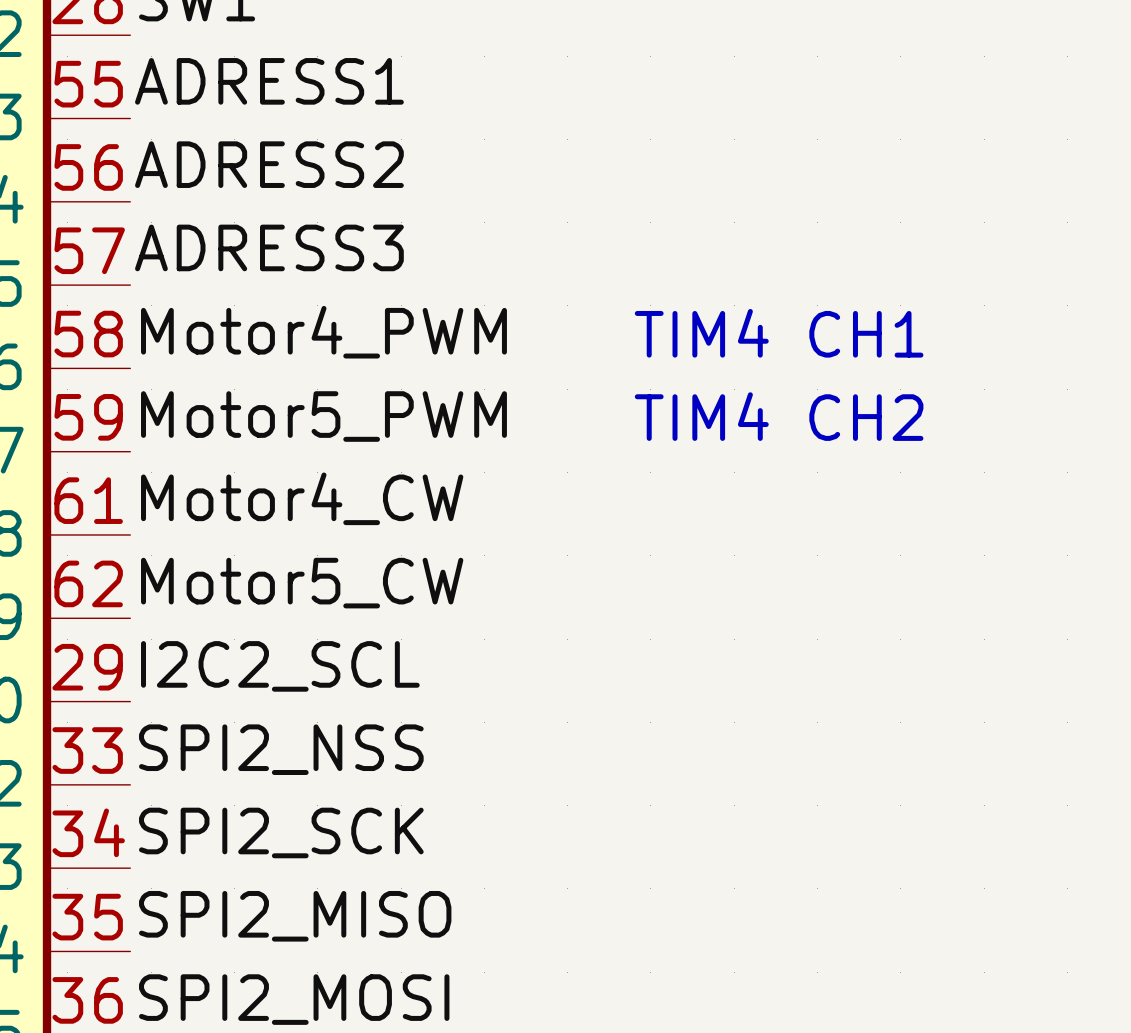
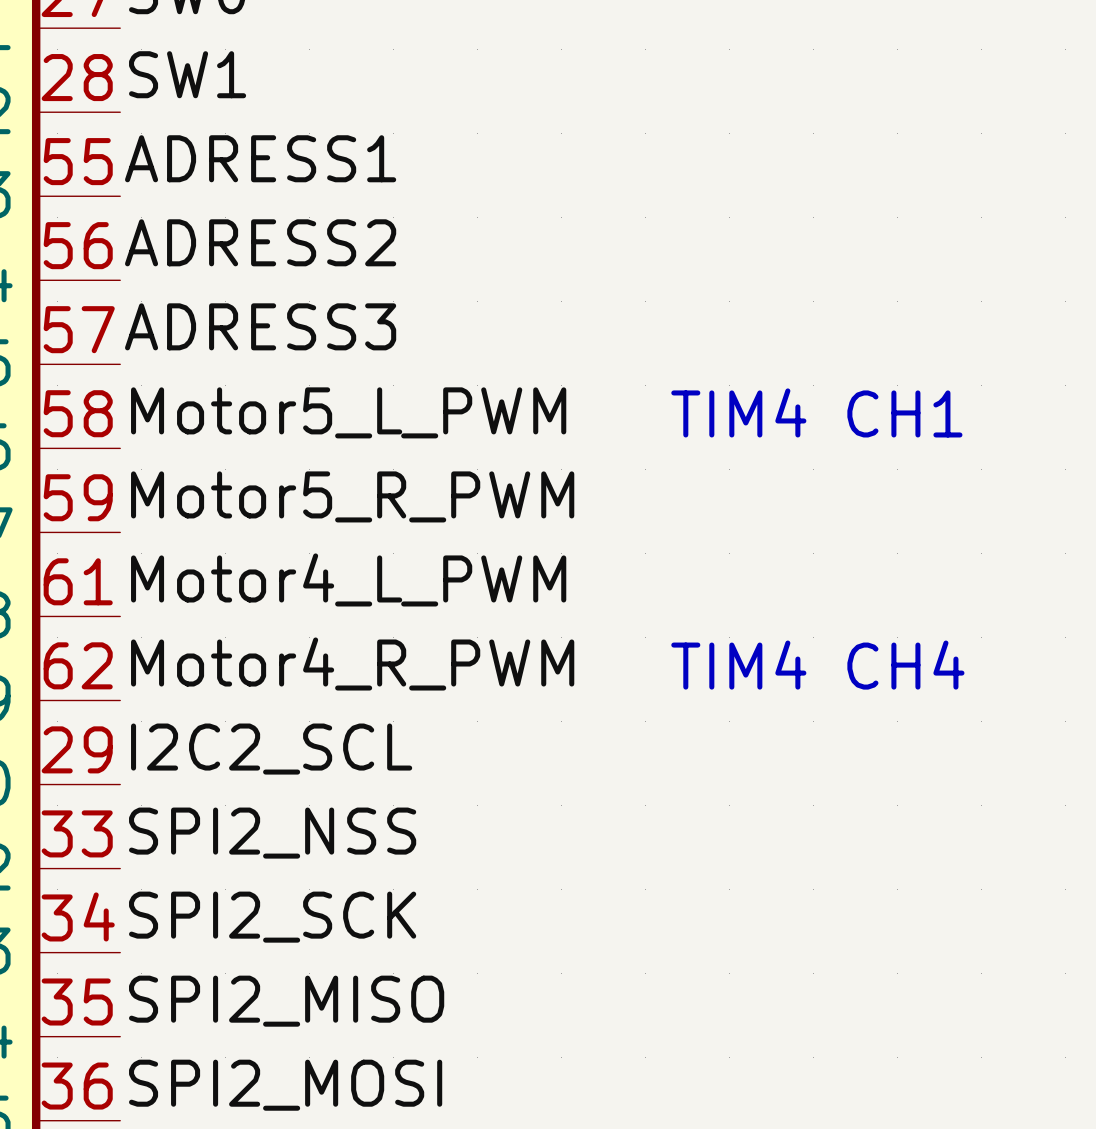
label: Motor4_PWM (323, 332) -> Motor5_L_PWM (348, 412)
text position: TIM4 CH1 (779, 333) -> TIM4 CH1 (816, 412)
label: Motor5_PWM (323, 416) -> Motor5_R_PWM (352, 496)
text: TIM4 CH2 (779, 416) -> none
label: Motor4_CW (302, 498) -> Motor4_L_PWM (348, 579)
label: Motor5_CW (302, 583) -> Motor4_R_PWM (352, 664)
text: none -> TIM4 CH4 (817, 665)

